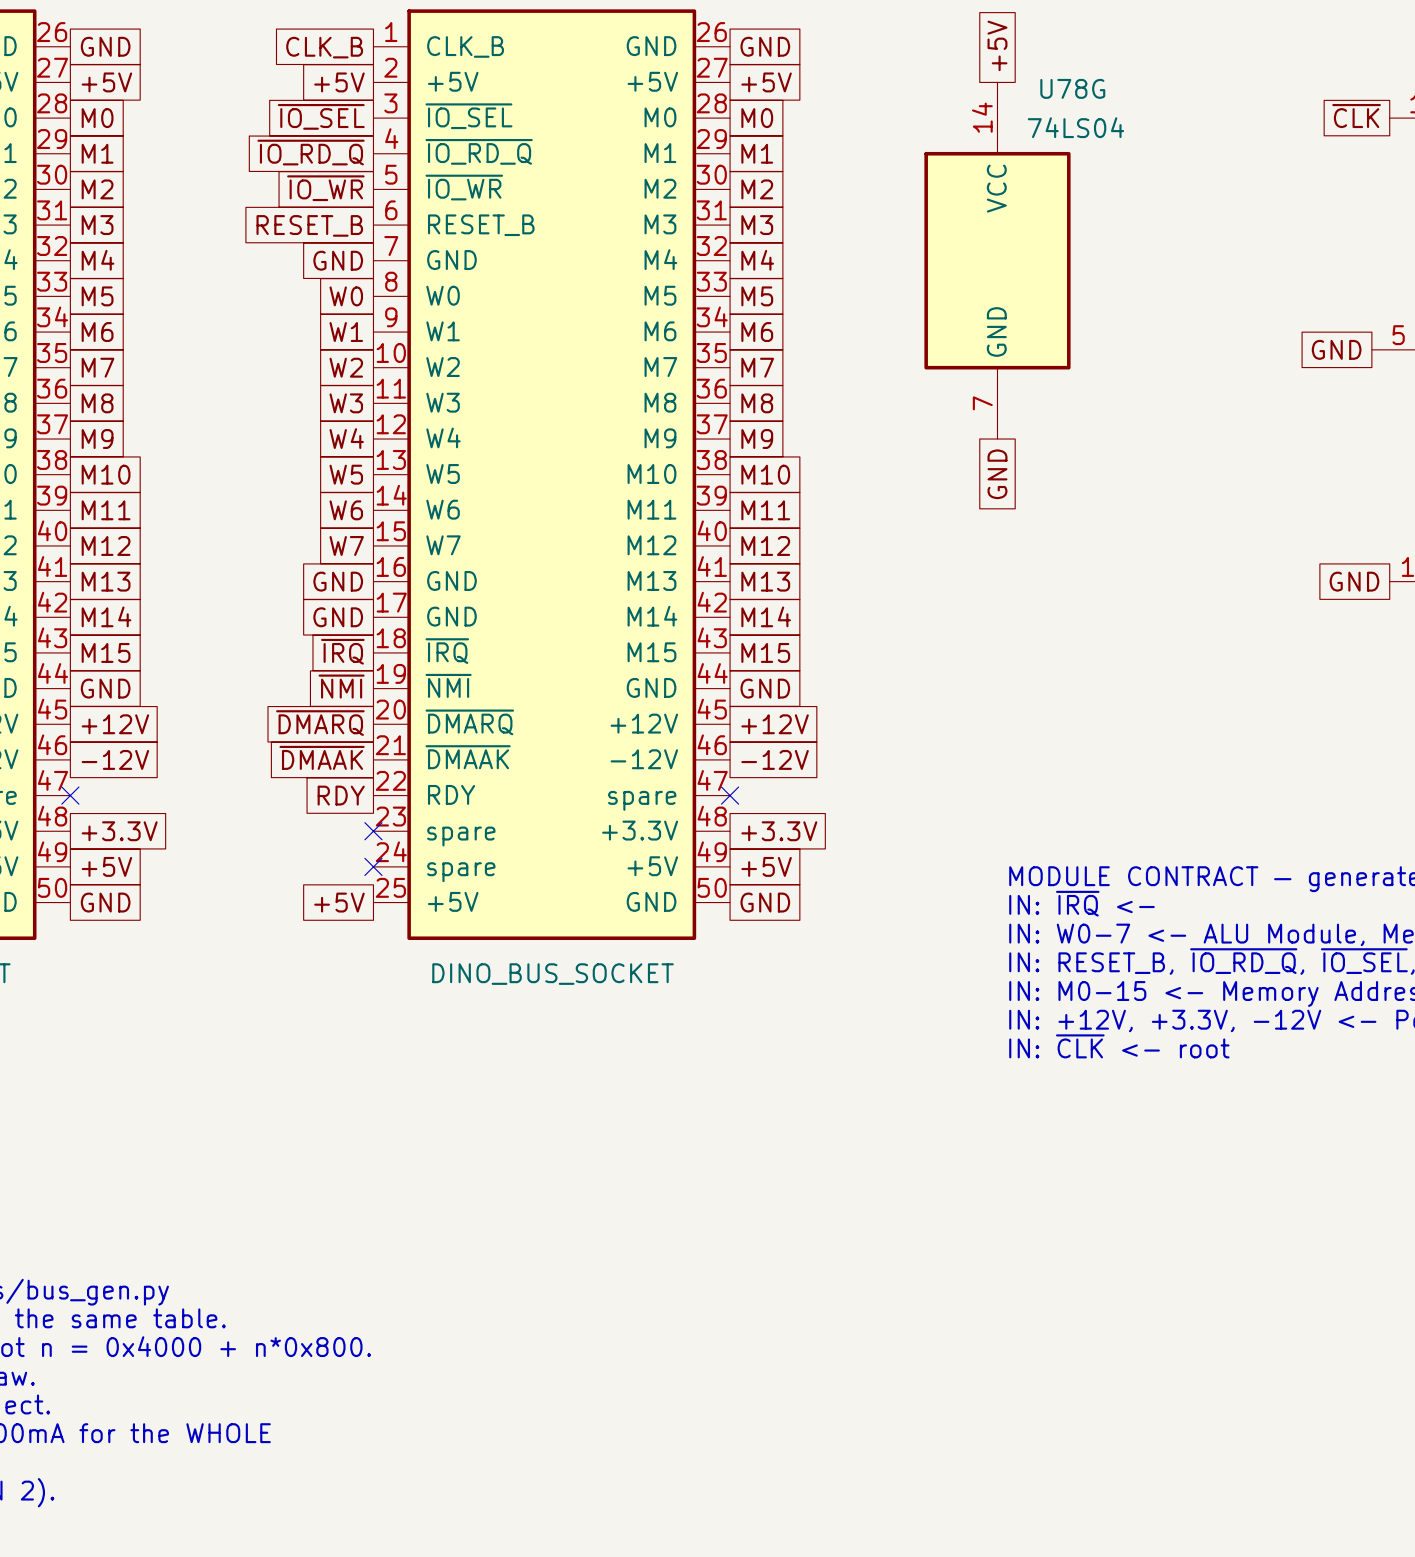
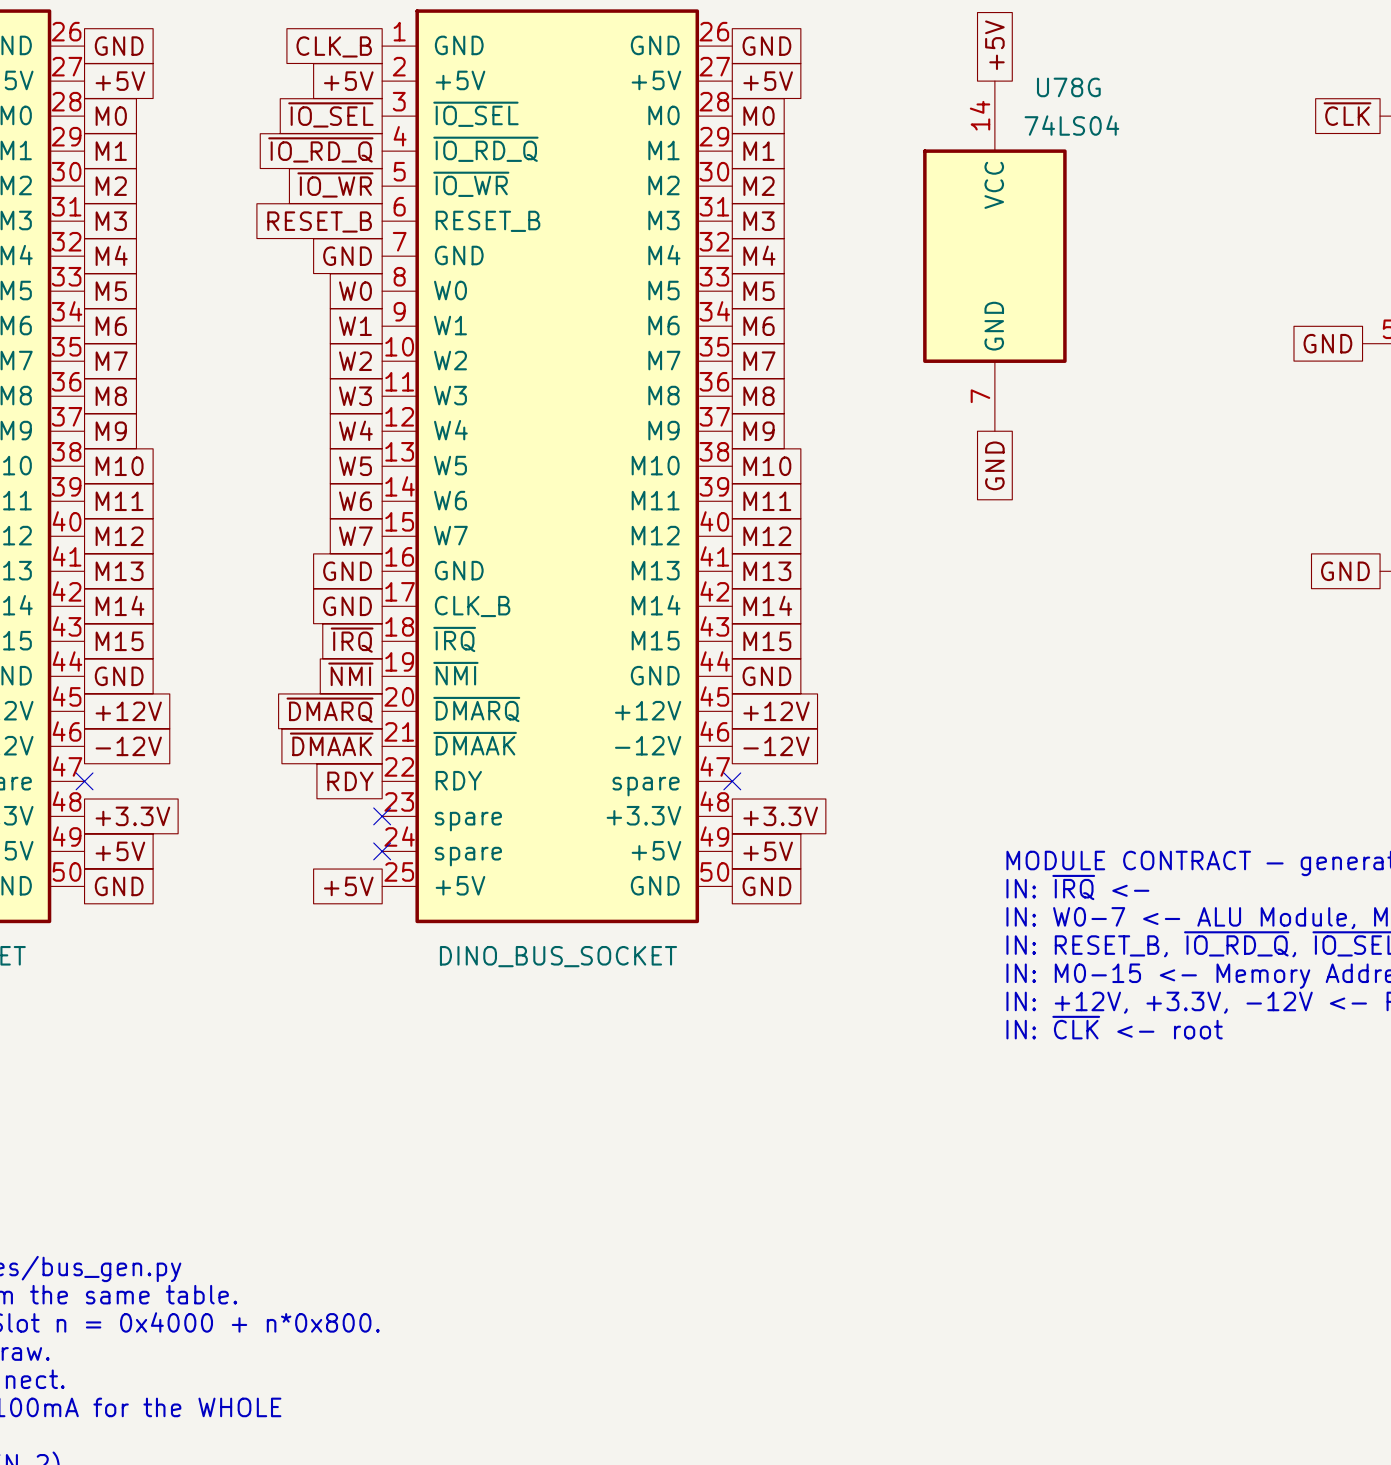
part pin name: CLK_B (465, 46) -> GND (459, 45)
part pin name: GND (451, 616) -> CLK_B (472, 606)

